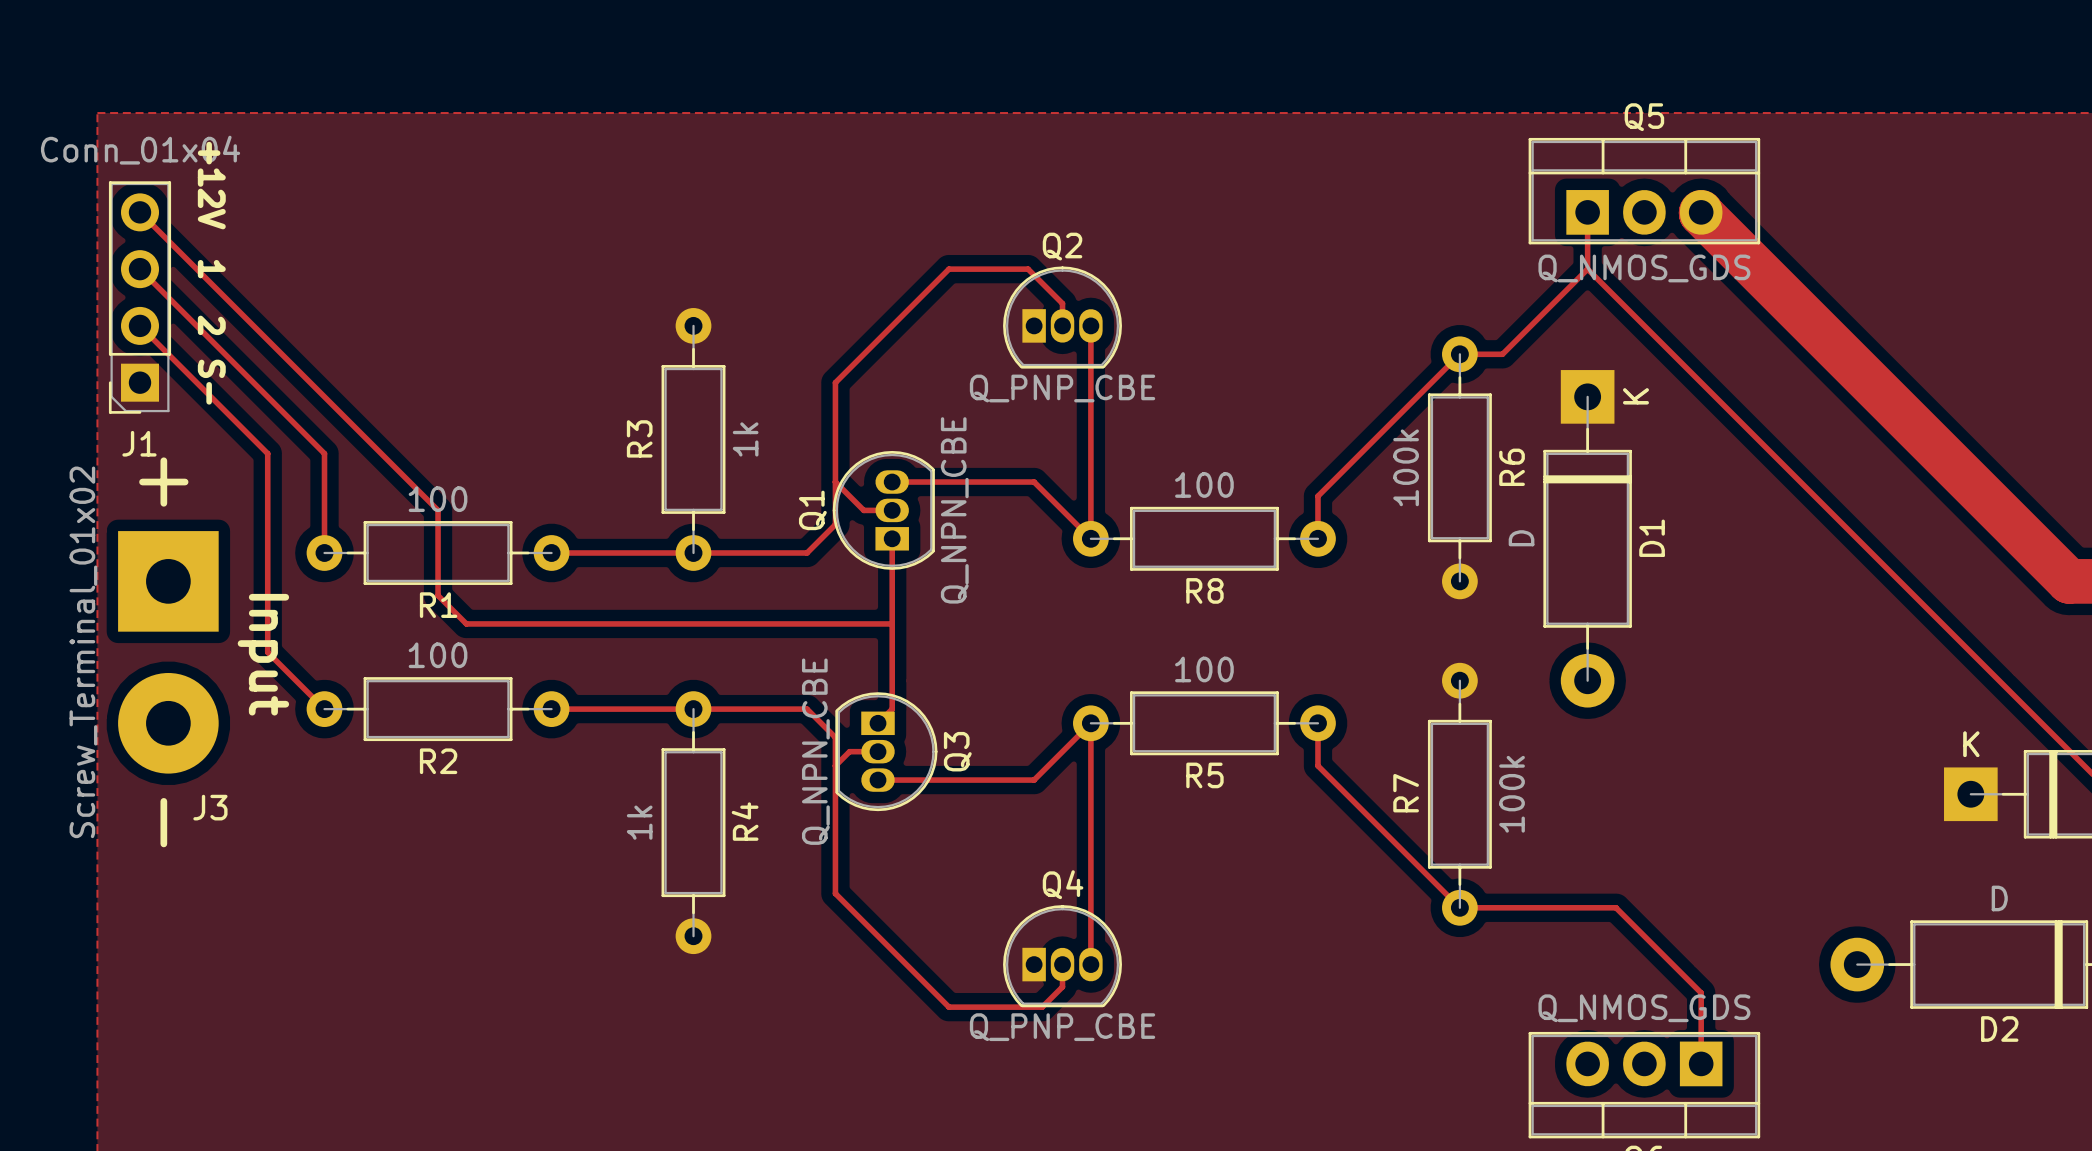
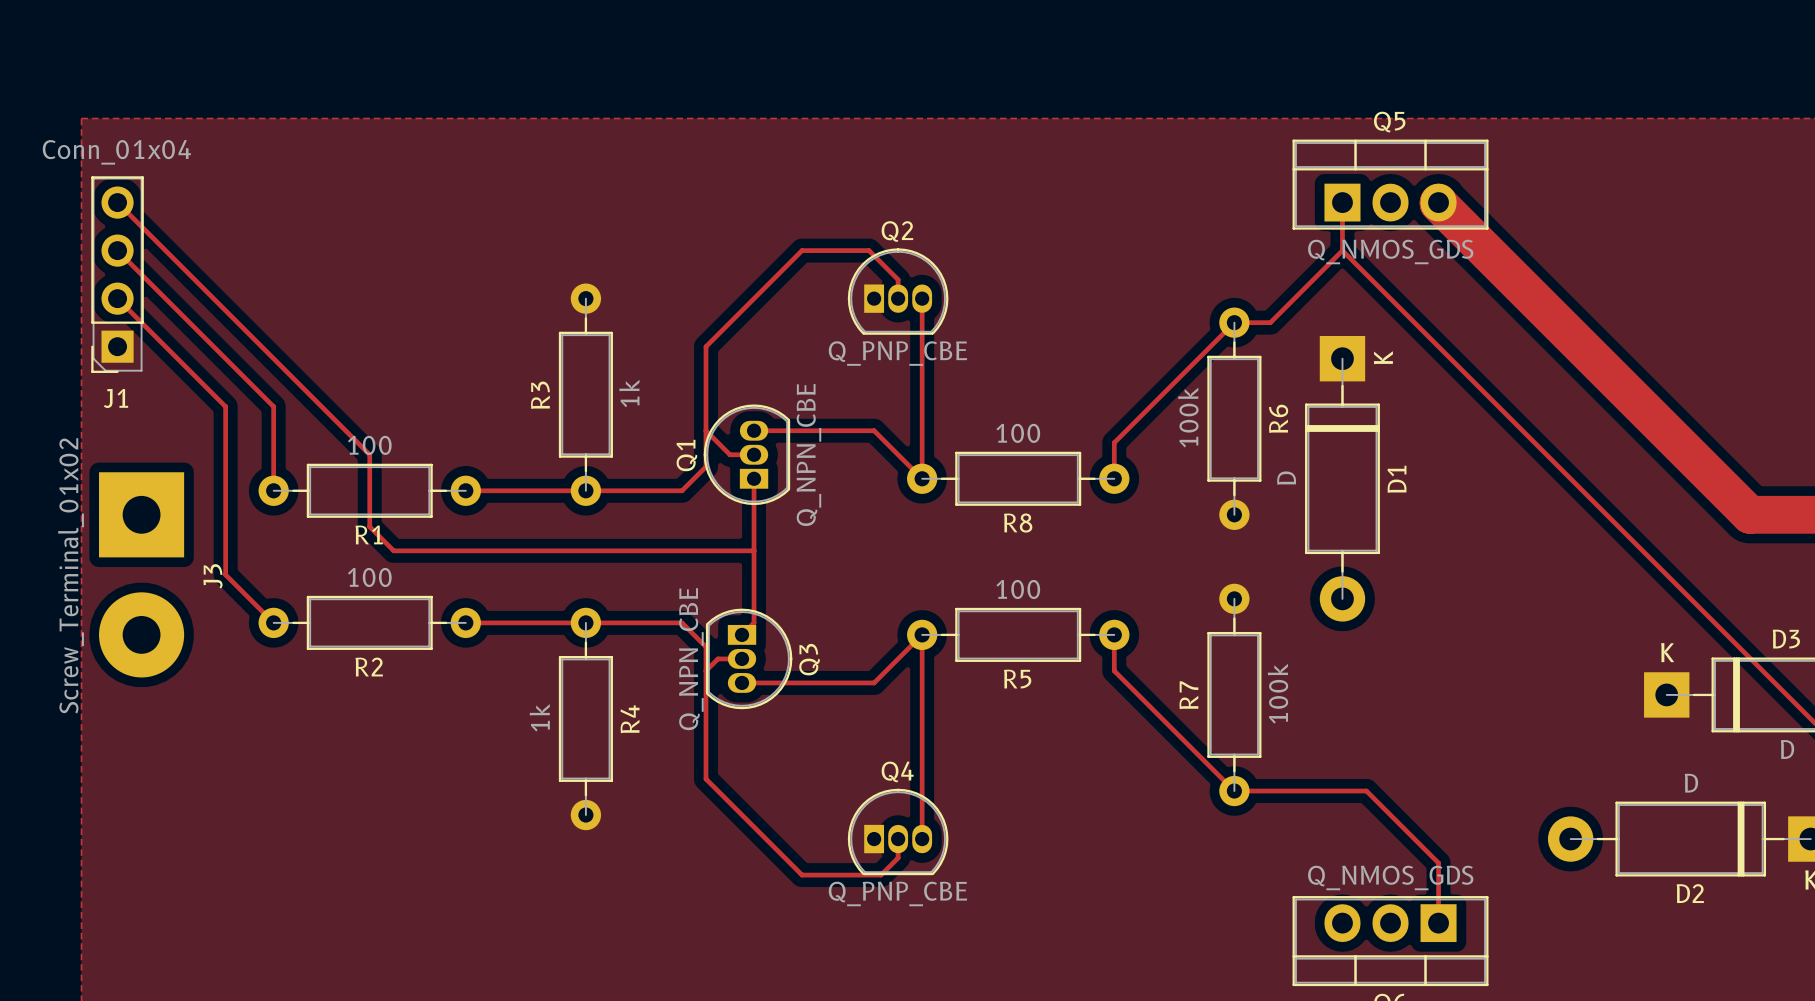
text: +12V (211, 185) -> none
text: 1 (211, 269) -> none
text: 2 (211, 325) -> none
text: S- (211, 382) -> none
text: + (163, 482) -> none
text: Input (263, 654) -> none
J3 name rotation: 0° (210, 807) -> 90° counterclockwise (213, 576)
J3 name position: J3 (210, 807) -> J3 (213, 576)
text: - (163, 822) -> none

